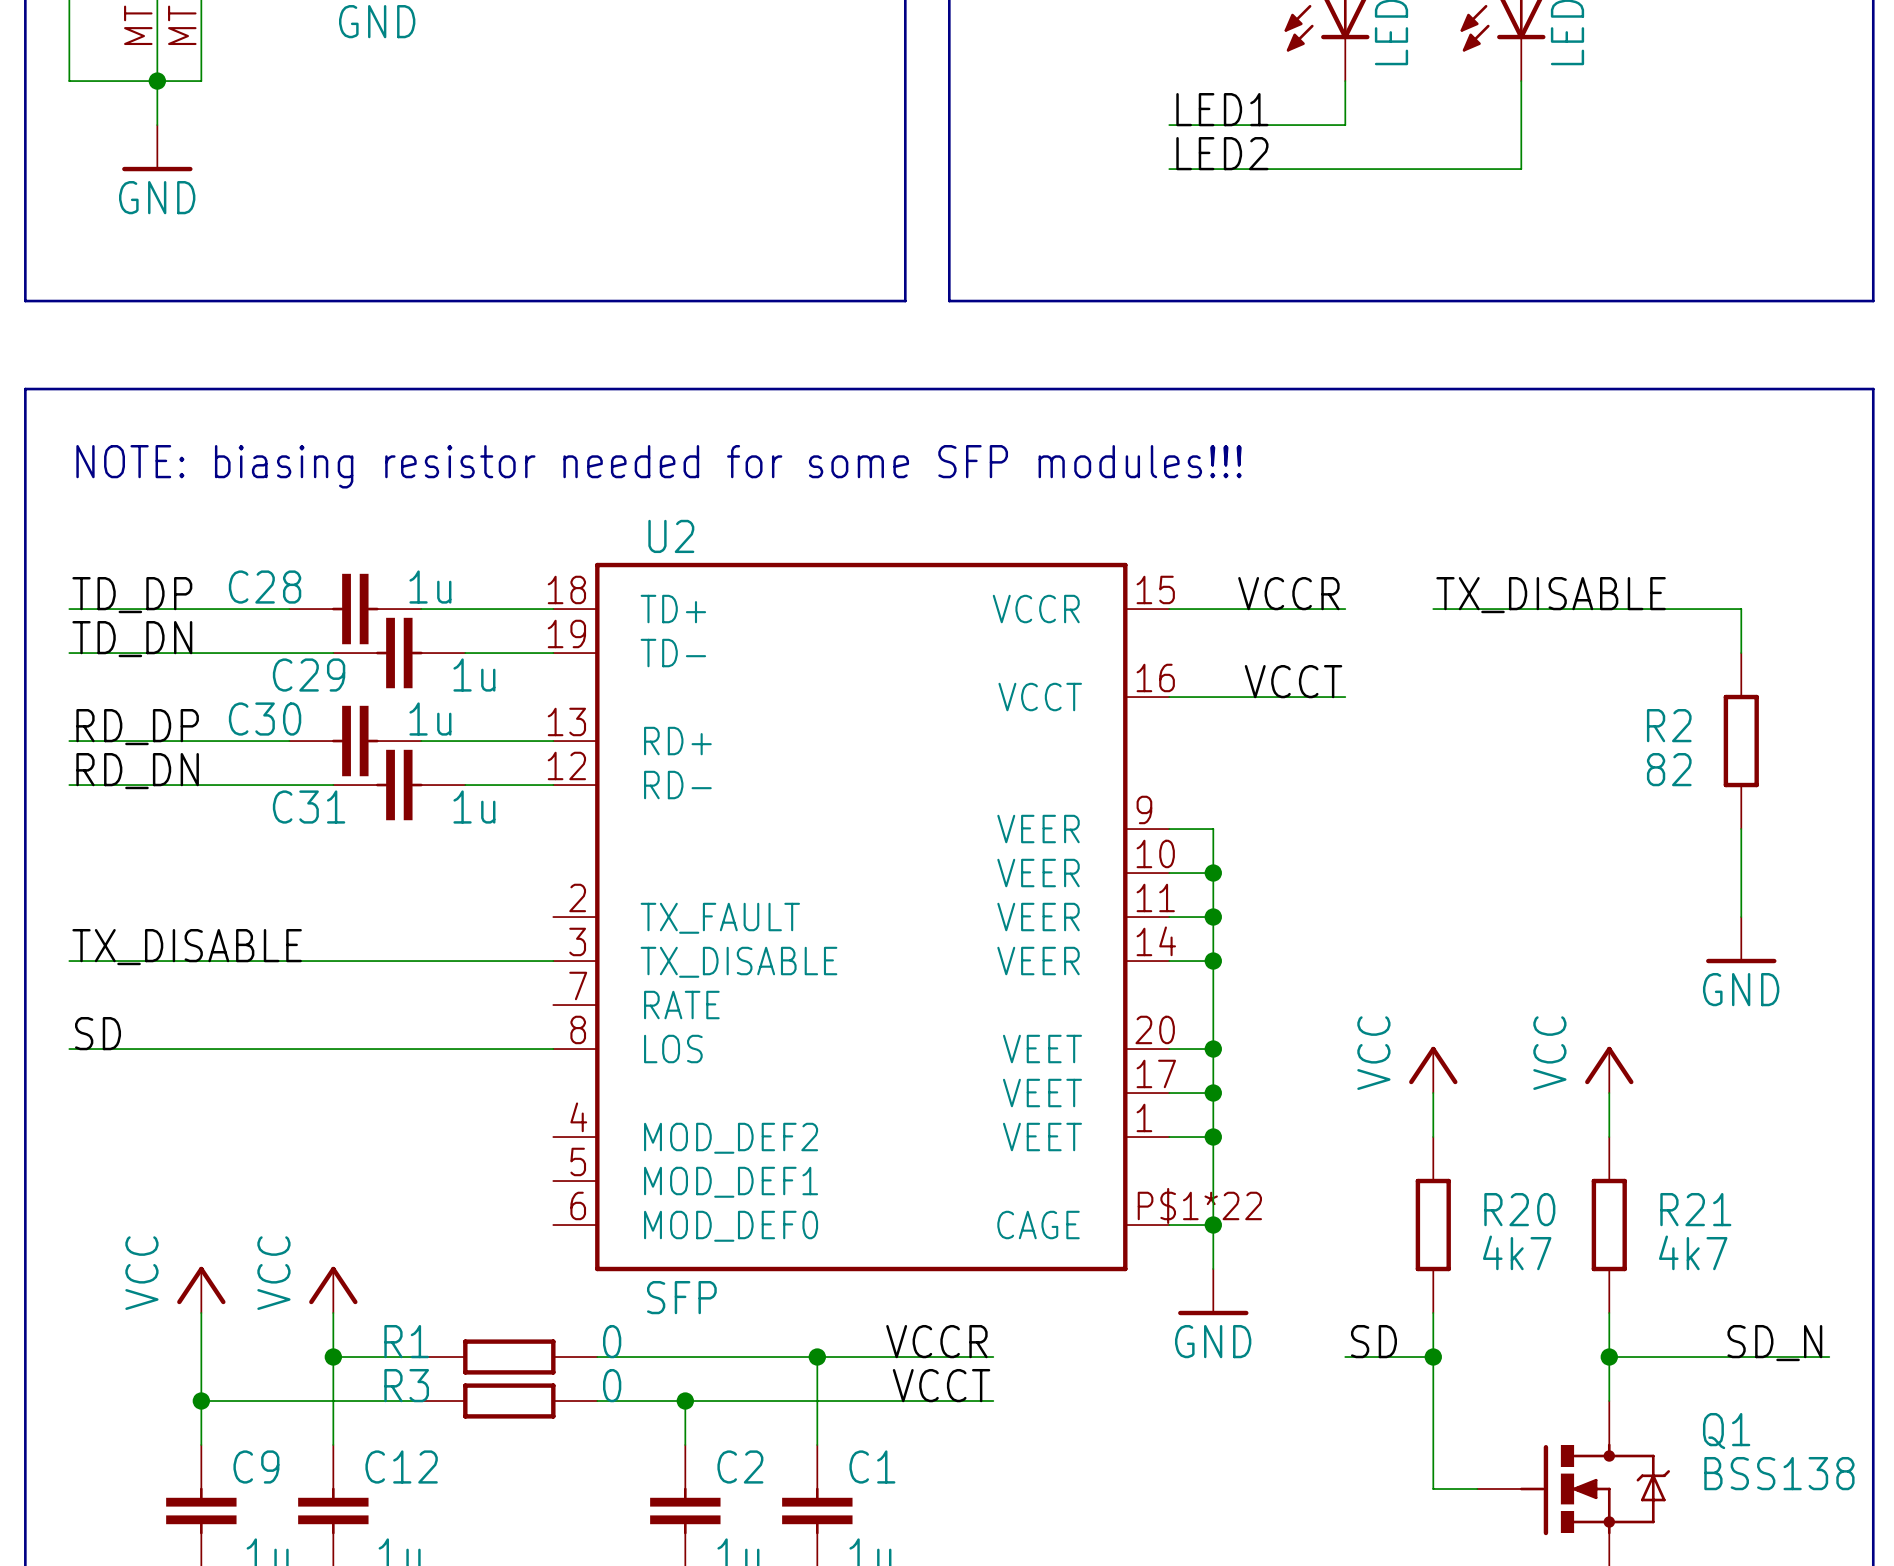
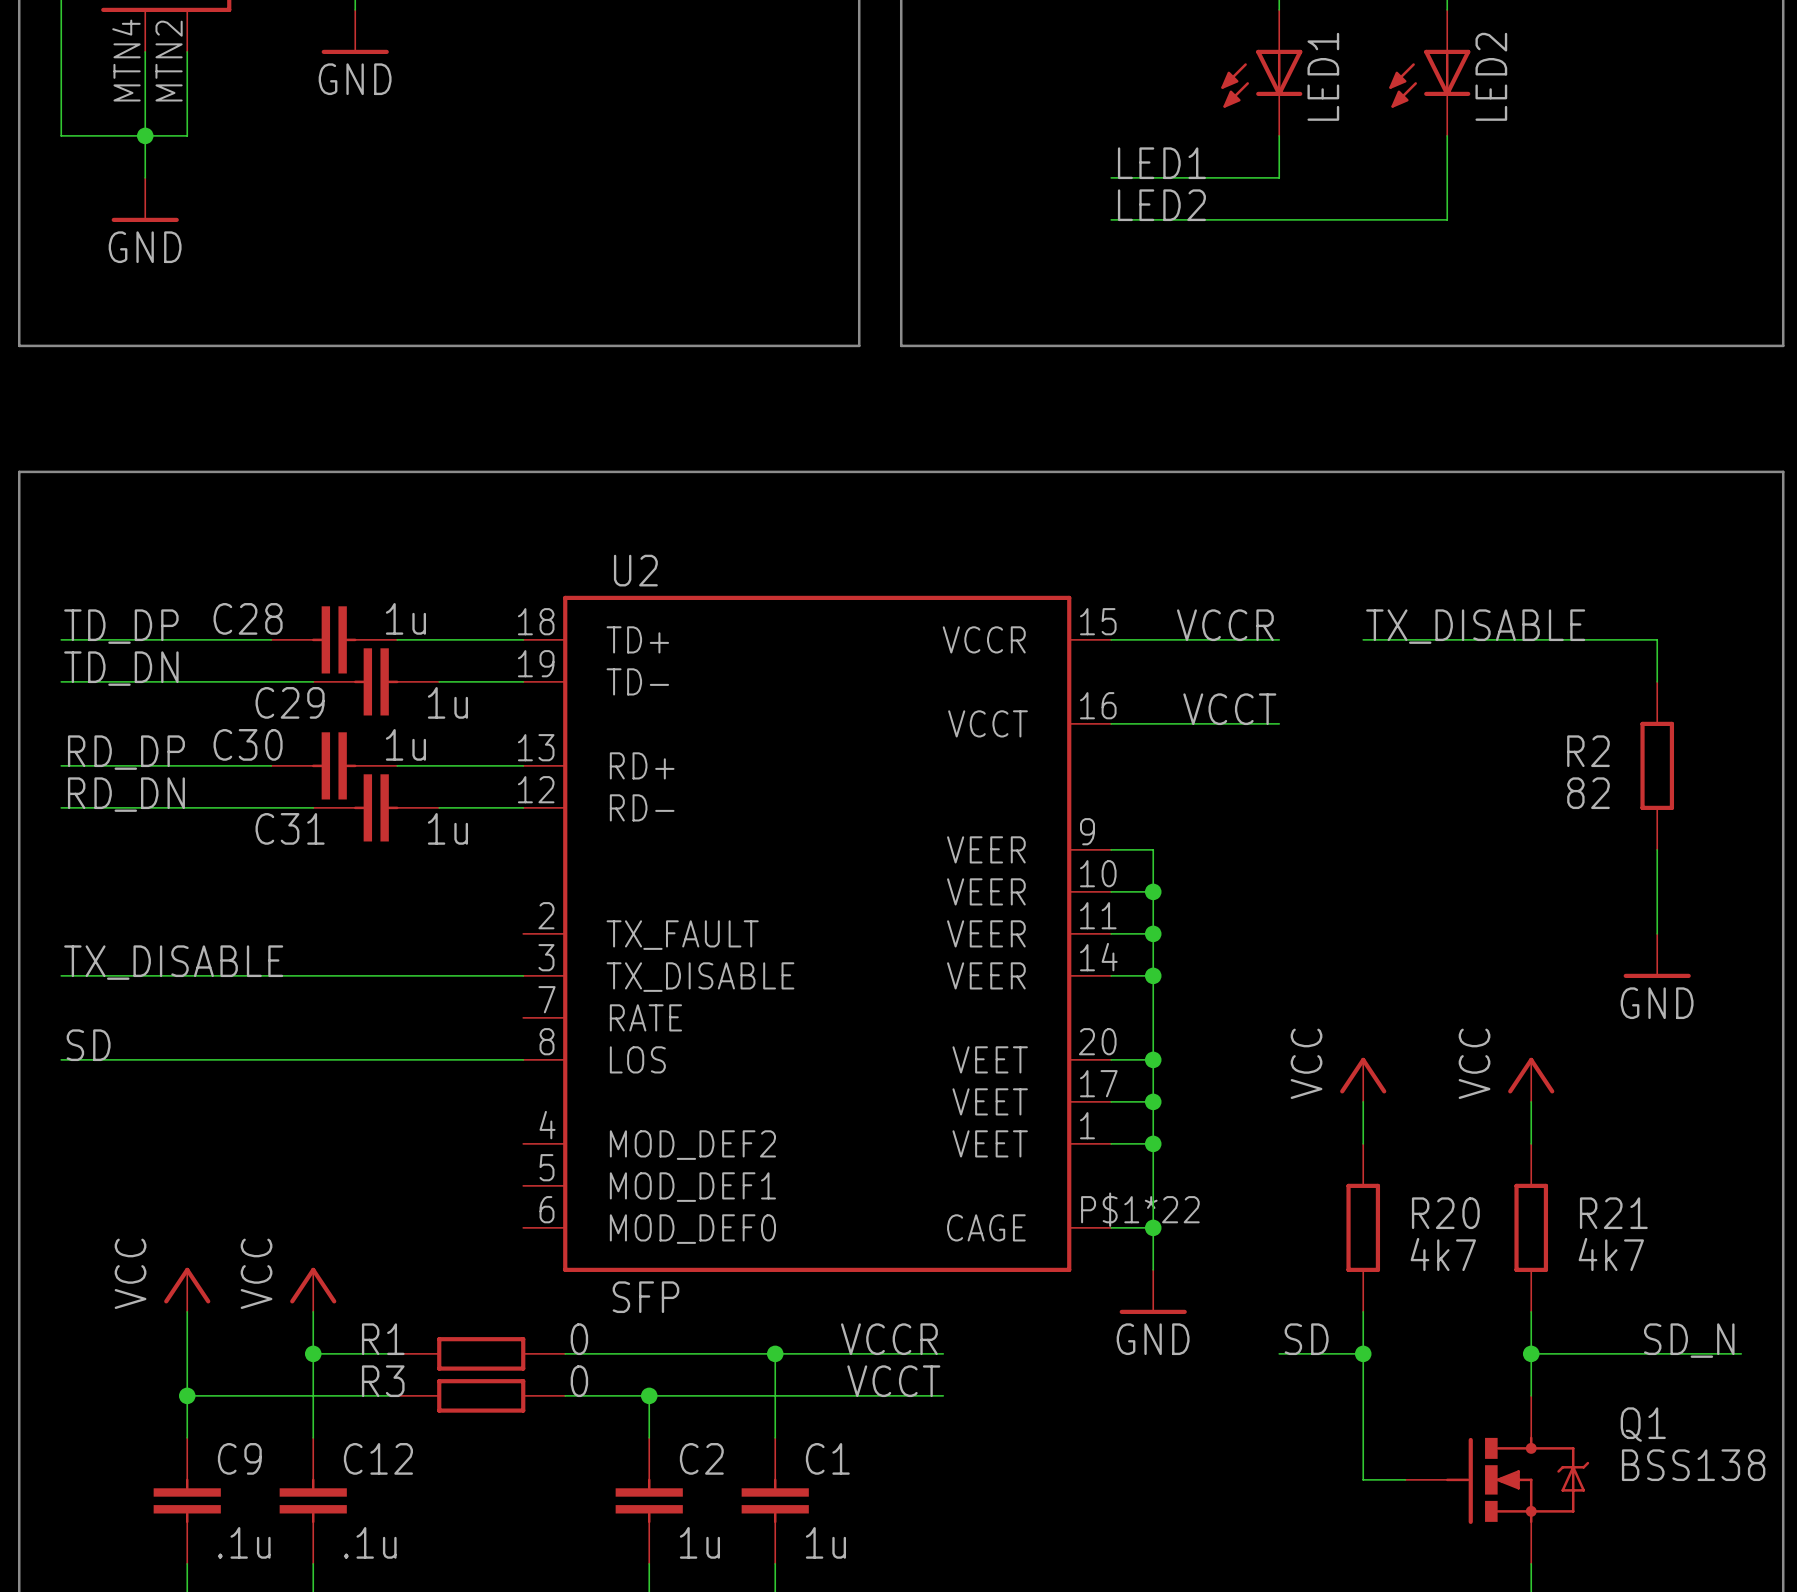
line: (25, 433) (25, 389) (1873, 389) (1873, 433) -> (19, 471) (1783, 471)
text: NOTE: biasing resistor needed for some SFP modules!!! (659, 466) -> none

